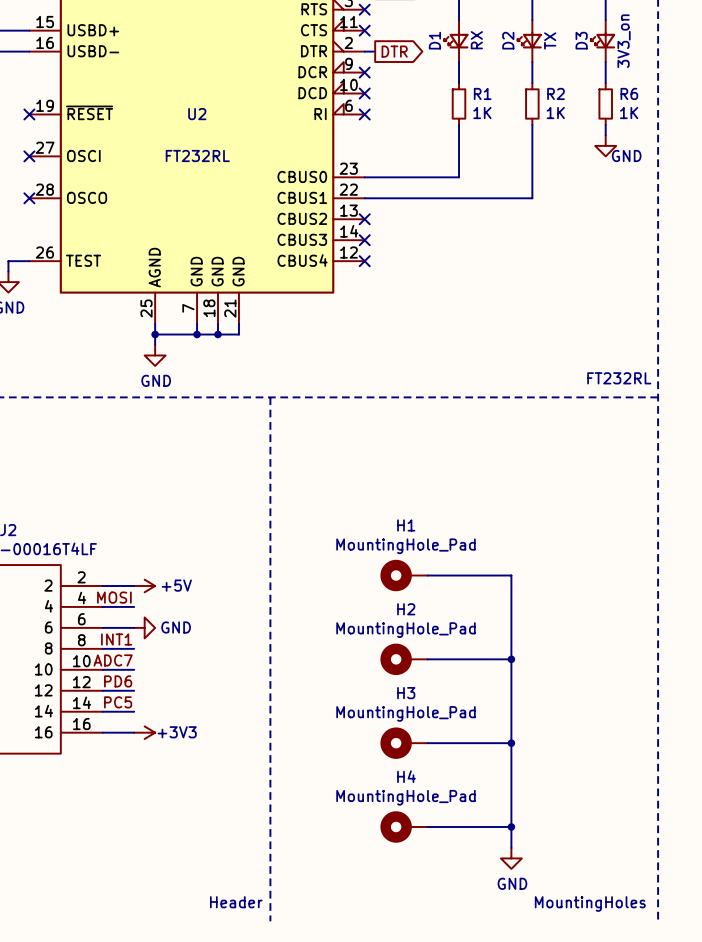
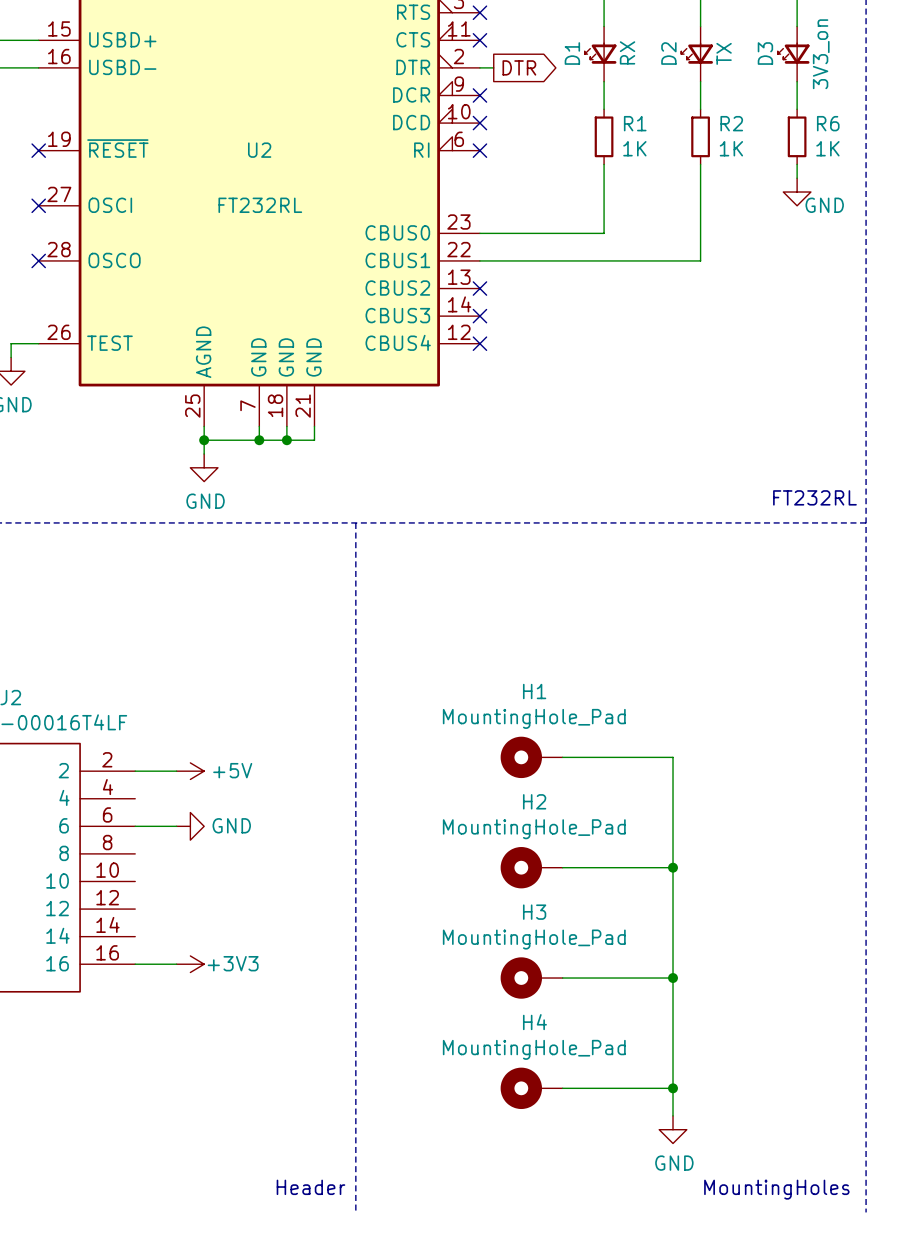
label: MOSI (114, 597) -> none
wire: (102, 606) (134, 606) -> none
label: INT1 (116, 639) -> none
wire: (102, 648) (134, 648) -> none
label: ADC7 (113, 660) -> none
wire: (102, 669) (134, 669) -> none
label: PD6 (118, 681) -> none
wire: (102, 690) (134, 690) -> none
label: PC5 (118, 702) -> none
wire: (102, 711) (134, 711) -> none

